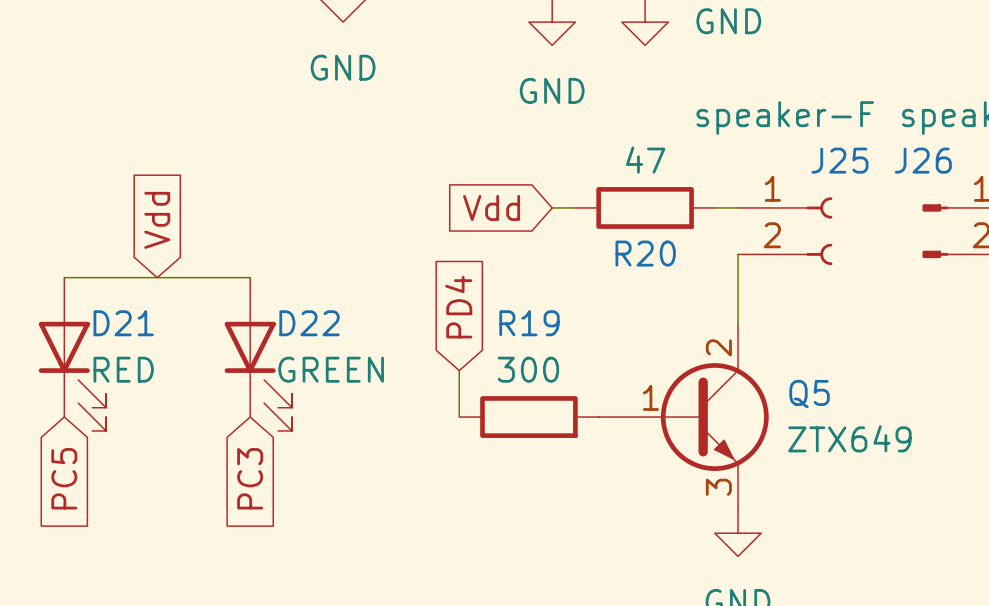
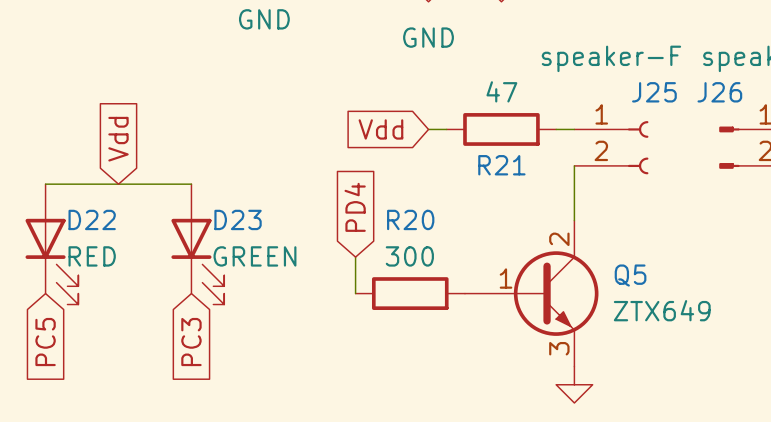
R20 name: R20 (645, 253) -> R21 (501, 165)
D21 name: D21 (123, 323) -> D22 (92, 219)
D22 name: D22 (309, 323) -> D23 (238, 219)
R19 name: R19 (529, 323) -> R20 (410, 219)

